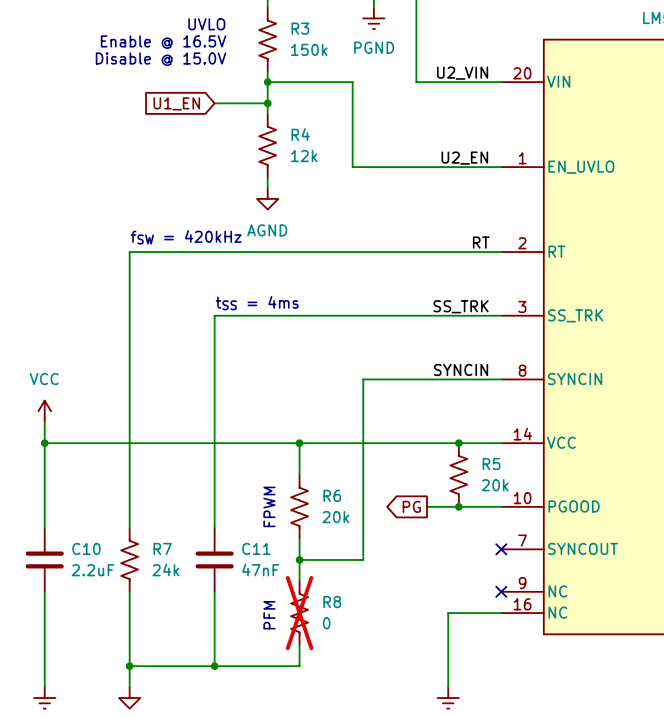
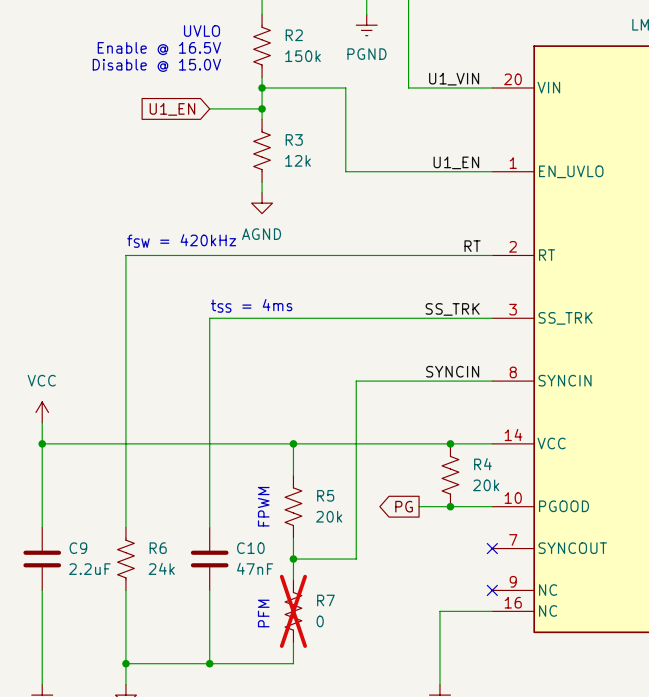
R3 name: R3 (300, 28) -> R2 (294, 35)
label: U2_VIN (462, 73) -> U1_VIN (454, 79)
R4 name: R4 (300, 134) -> R3 (294, 139)
label: U2_EN (464, 158) -> U1_EN (456, 162)
R5 name: R5 (491, 464) -> R4 (482, 464)
R6 name: R6 (332, 495) -> R5 (325, 495)
C10 name: C10 (86, 548) -> C9 (78, 548)
R7 name: R7 (162, 548) -> R6 (158, 548)
C11 name: C11 (256, 548) -> C10 (250, 548)
R8 name: R8 (332, 602) -> R7 (325, 600)

